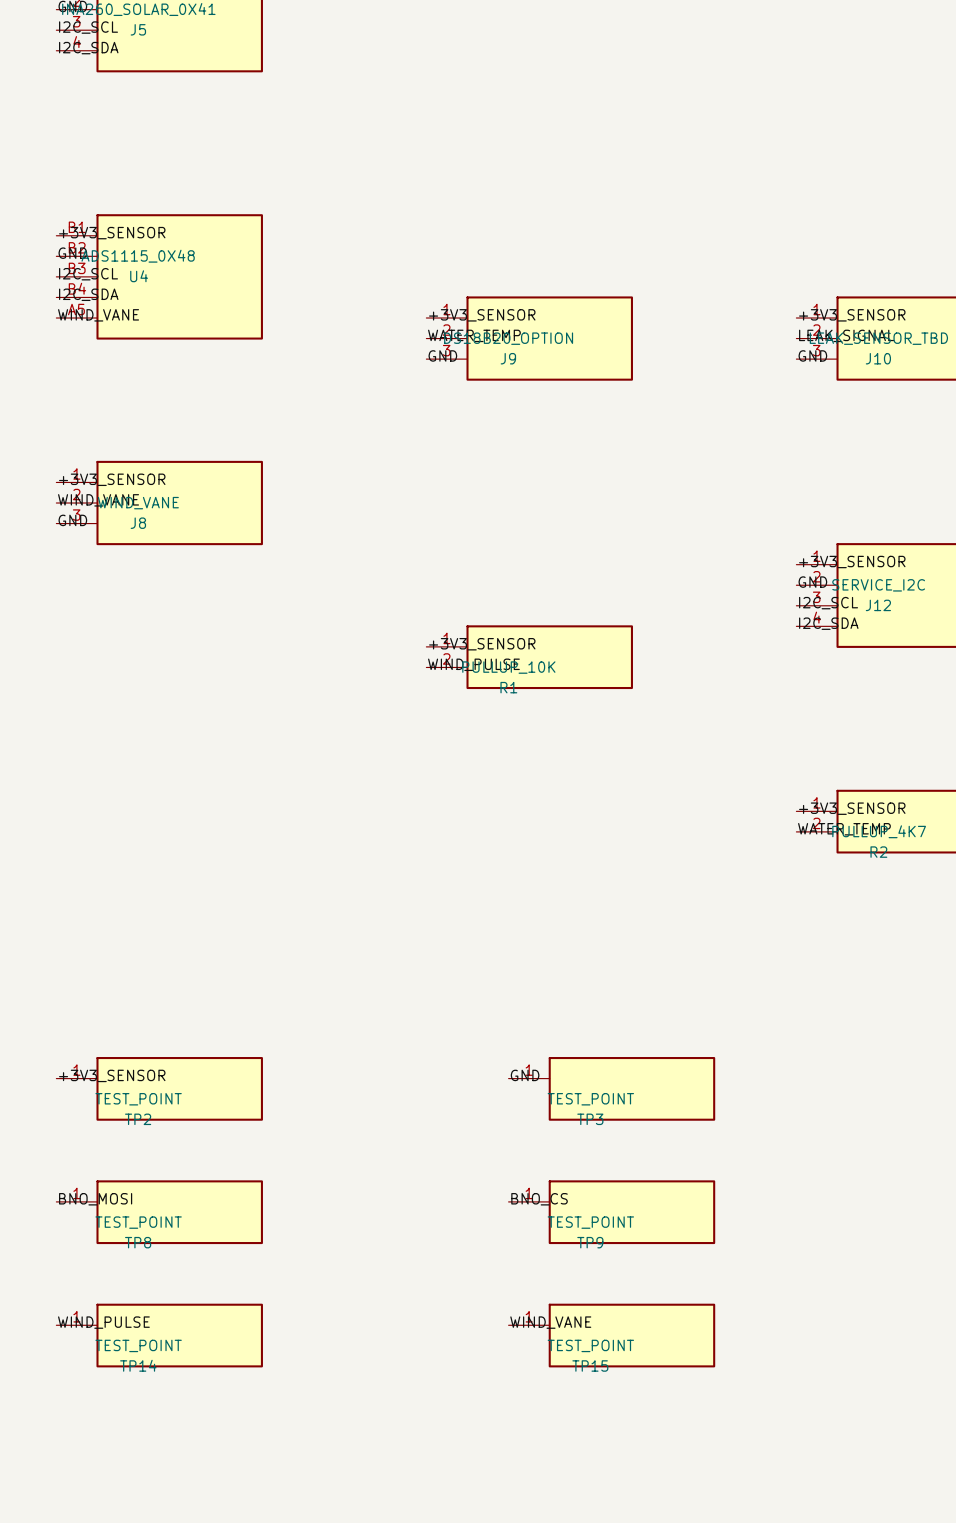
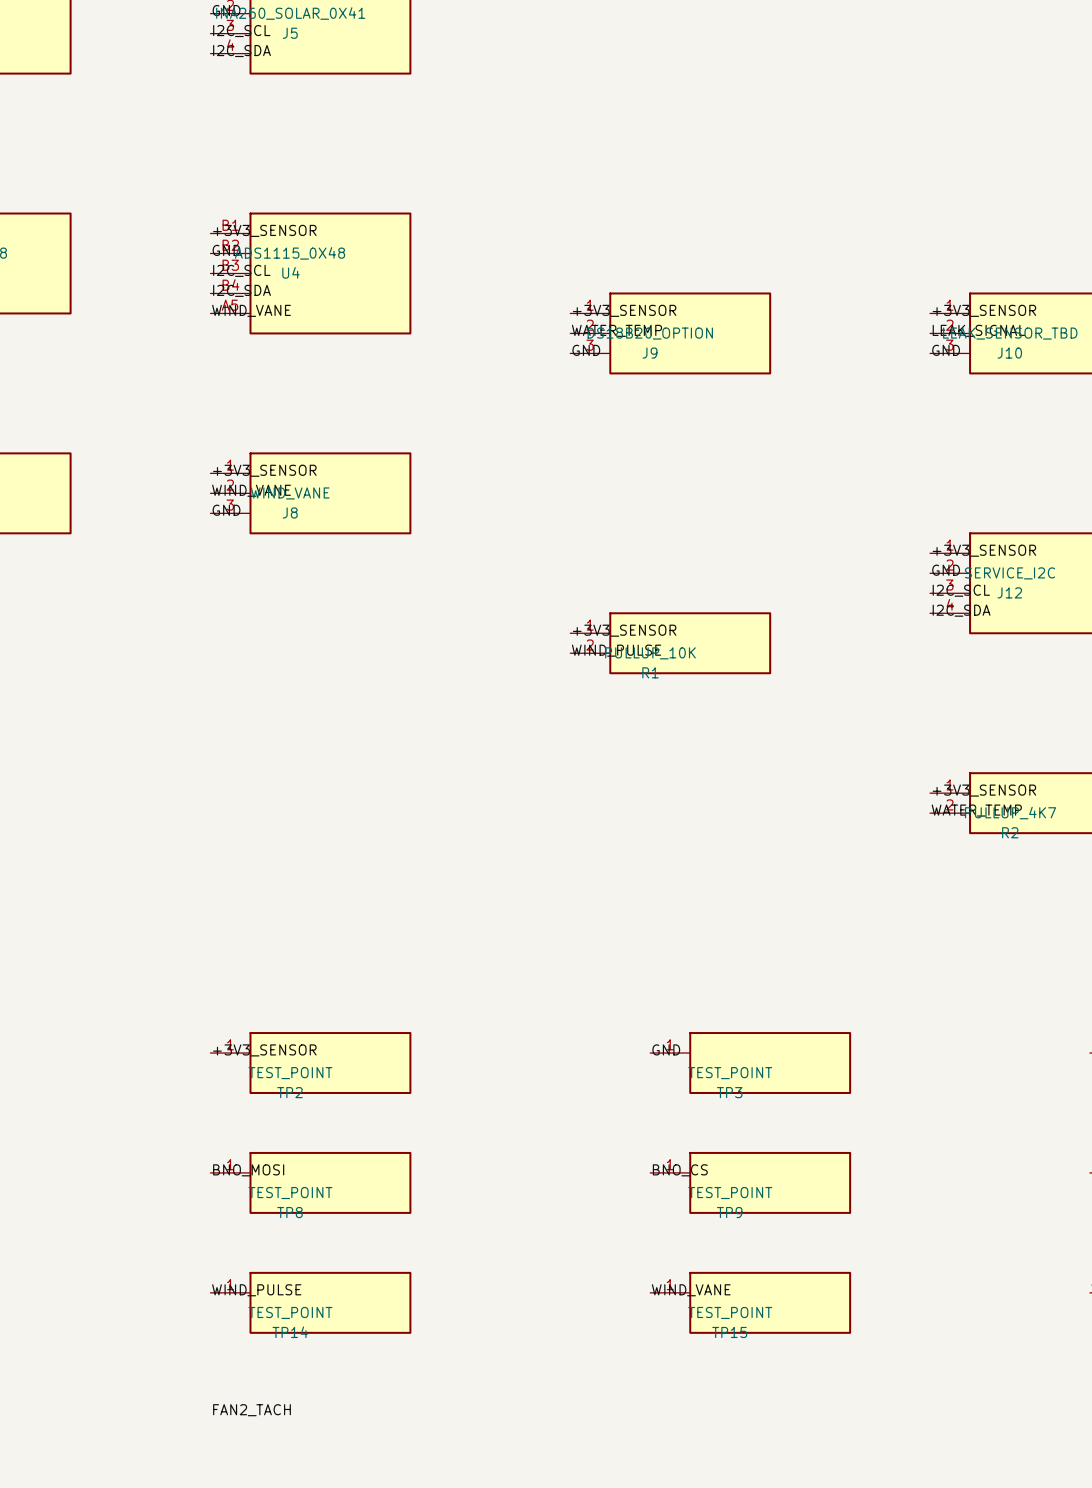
label: none -> FAN2_TACH (251, 1410)

